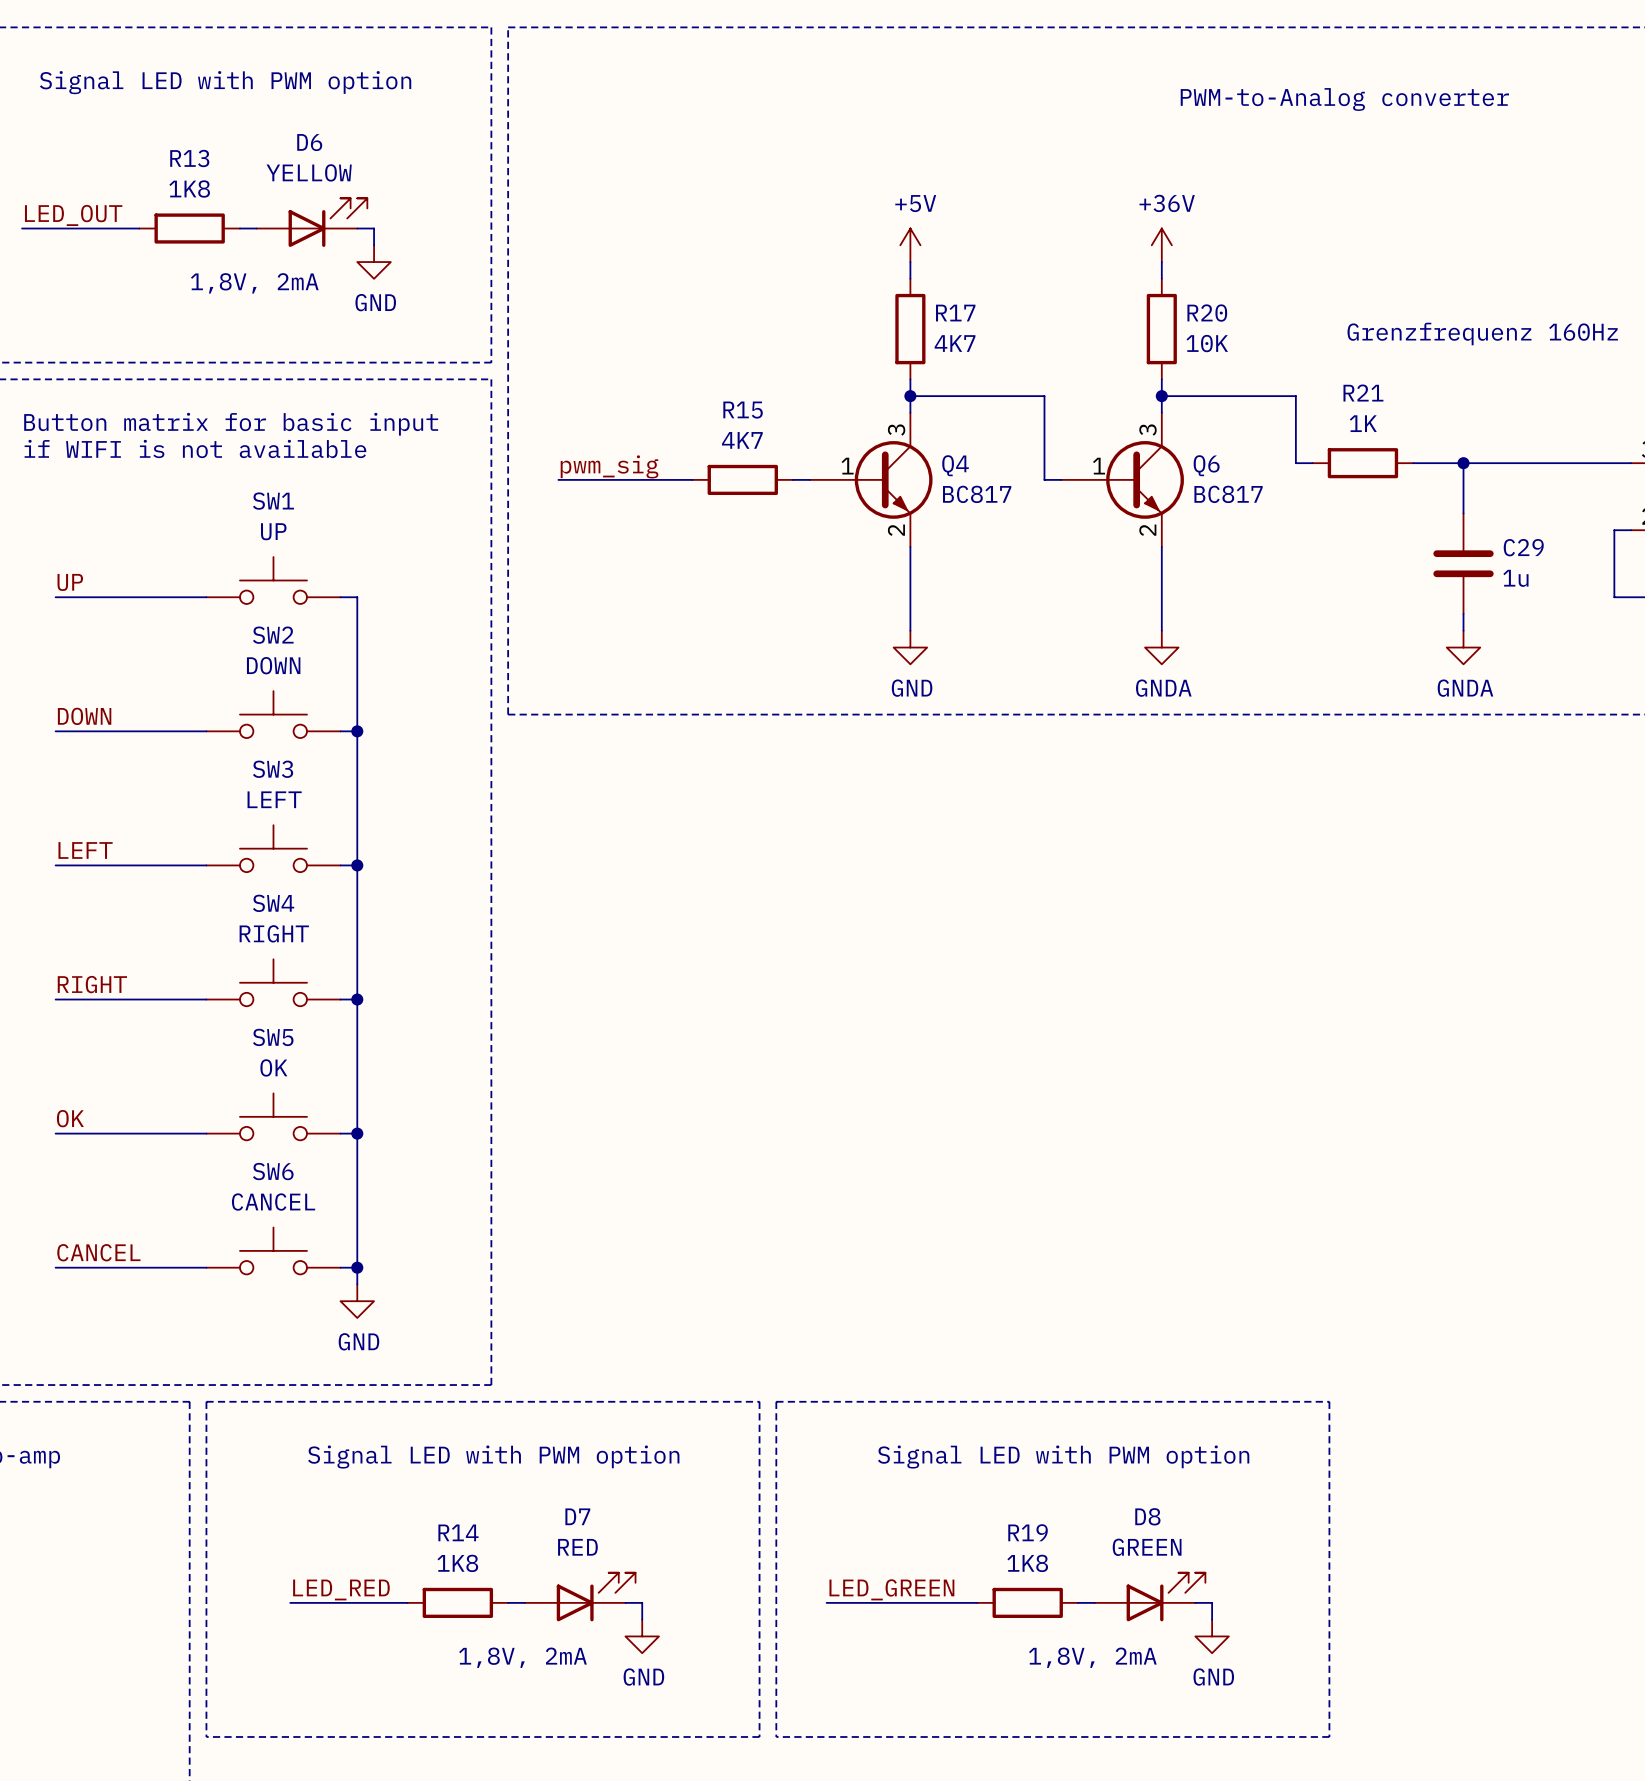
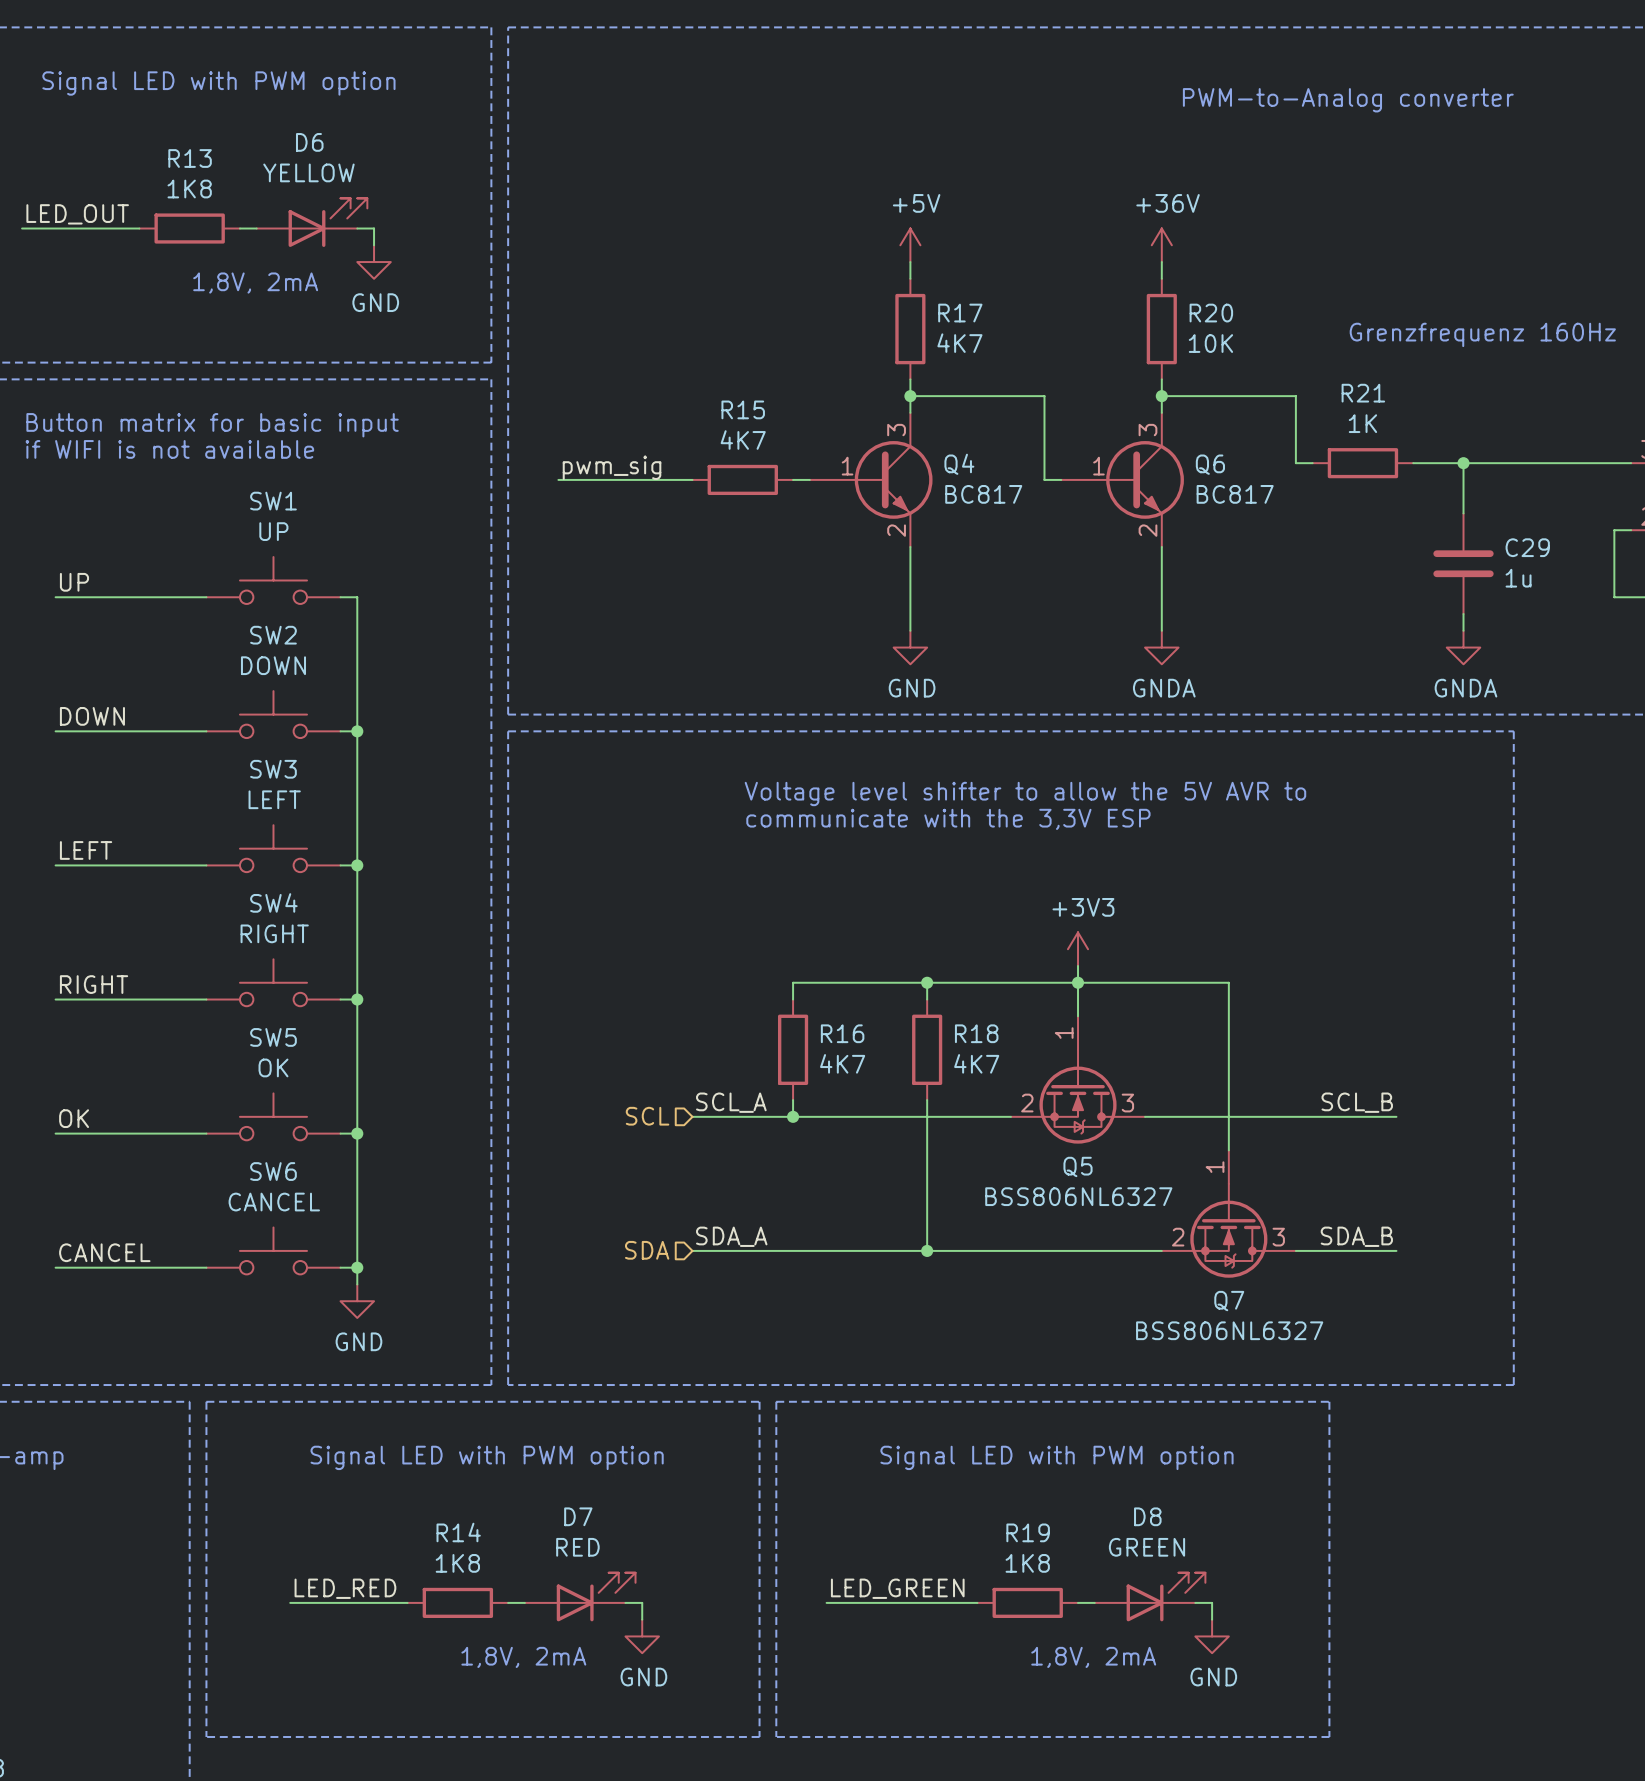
line: none -> (508, 731) (508, 1385) (1513, 1385) (1513, 731) (508, 731)
text: none -> Voltage level shifter to allow the 5V AVR to (1025, 793)
text: none -> communicate with the 3,3V ESP (948, 819)
power symbol: none -> +3V3 (1078, 949)
wire: none -> (1078, 965) (1078, 1016)
wire: none -> (927, 982) (927, 999)
junction: none -> (927, 982)
junction: none -> (1078, 982)
wire: none -> (793, 999) (793, 982) (1228, 982) (1228, 1150)
R16: none -> 4K7 (793, 1049)
R18: none -> 4K7 (927, 1049)
Q5: none -> BSS806NL6327 (1078, 1079)
wire: none -> (793, 1100) (793, 1116)
wire: none -> (927, 1100) (927, 1250)
label: none -> SCL_A (731, 1102)
label: none -> SCL_B (1357, 1102)
hierarchical label: none -> SCL (647, 1116)
wire: none -> (692, 1116) (1010, 1116)
junction: none -> (793, 1116)
wire: none -> (1145, 1116) (1396, 1116)
Q7: none -> BSS806NL6327 (1228, 1214)
label: none -> SDA_A (731, 1236)
label: none -> SDA_B (1356, 1236)
hierarchical label: none -> SDA (647, 1250)
wire: none -> (692, 1250) (1161, 1250)
junction: none -> (927, 1250)
wire: none -> (1295, 1250) (1396, 1250)

